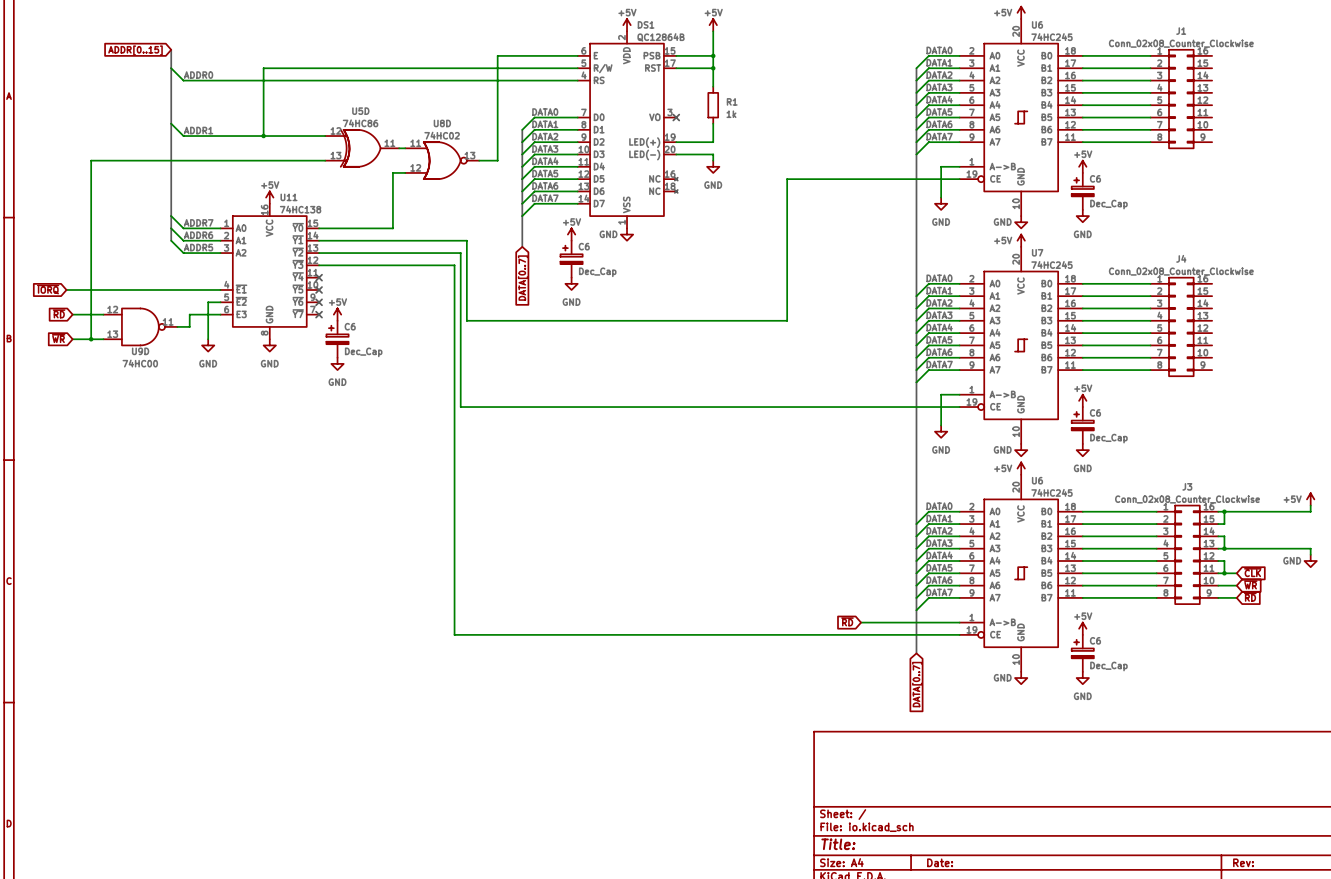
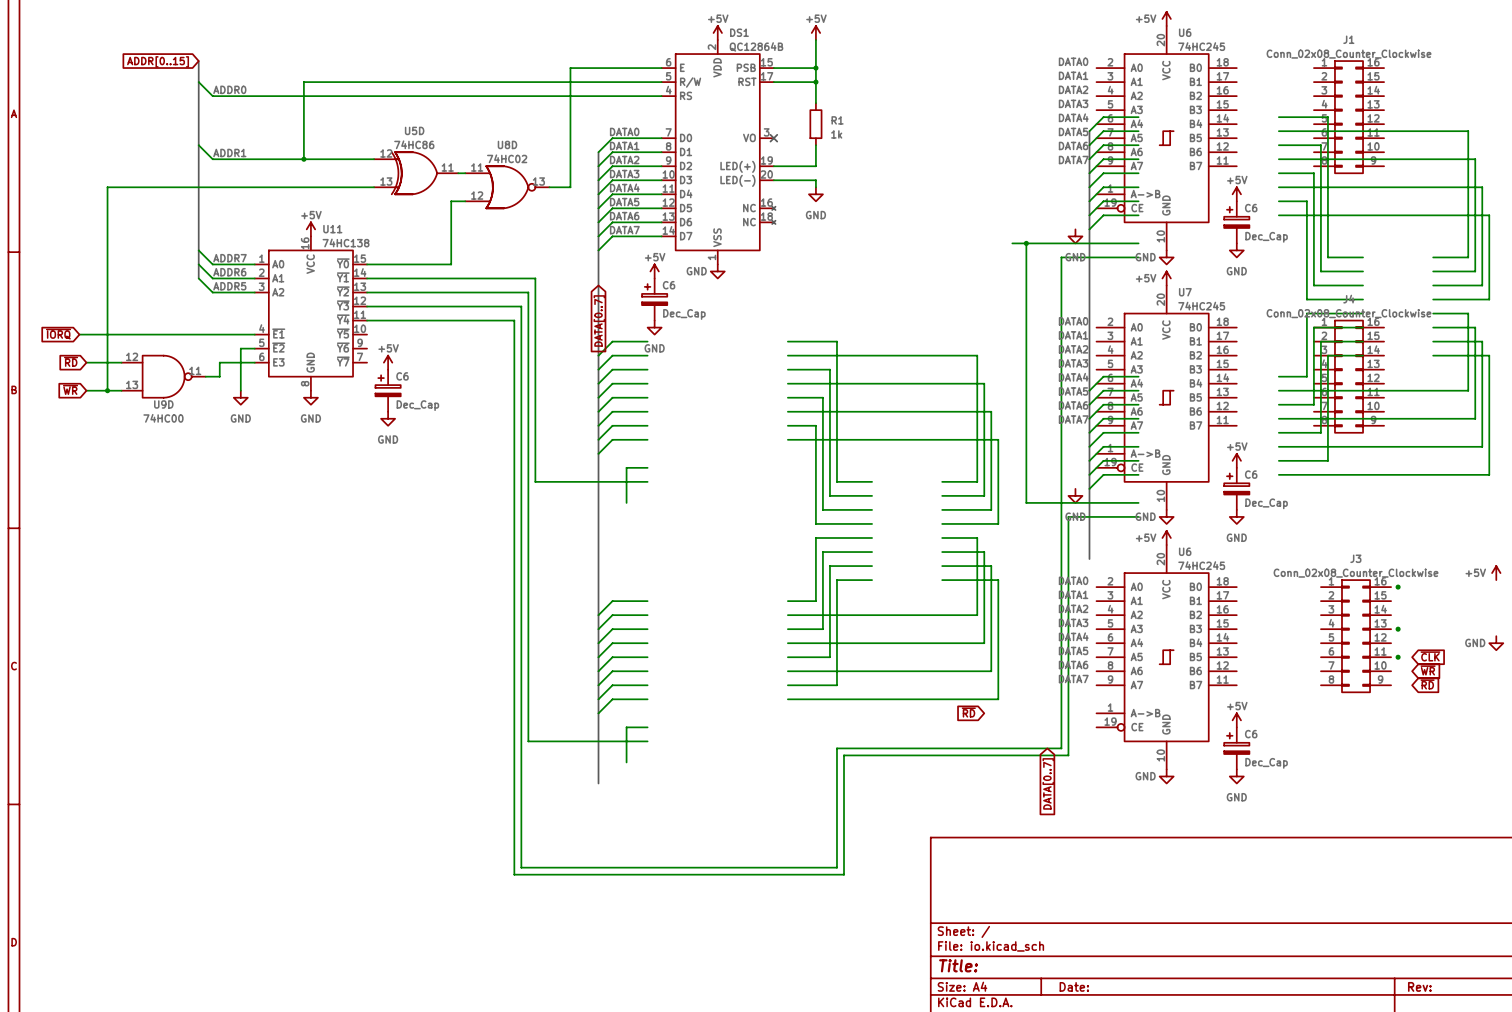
wire: (959, 55) (928, 55) (916, 68) -> (1138, 117) (1103, 117) (1089, 131)
wire: (1082, 55) (1150, 55) -> none
bus: (916, 68) (916, 653) -> none
wire: (959, 68) (928, 68) (916, 80) -> (1138, 131) (1103, 131) (1089, 145)
wire: (1082, 68) (1150, 68) -> none
wire: (959, 80) (928, 80) (916, 92) -> (1138, 145) (1103, 145) (1089, 159)
wire: (1082, 80) (1150, 80) -> none
wire: (959, 92) (928, 92) (916, 105) -> (1138, 159) (1103, 159) (1089, 173)
wire: (1082, 92) (1150, 92) -> none
wire: none -> (1278, 117) (1327, 117) (1327, 257) (1363, 257)
wire: (959, 105) (928, 105) (916, 117) -> (1138, 173) (1103, 173) (1089, 187)
wire: (1082, 105) (1150, 105) -> none
bus: none -> (1089, 131) (1089, 559)
wire: none -> (1278, 131) (1468, 131) (1468, 257) (1433, 257)
wire: (959, 117) (928, 117) (916, 129) -> (1138, 187) (1103, 187) (1089, 201)
wire: (1082, 117) (1150, 117) -> none
wire: none -> (1278, 145) (1320, 145) (1320, 271) (1363, 271)
wire: (959, 129) (928, 129) (916, 142) -> (1138, 201) (1103, 201) (1089, 215)
wire: (1082, 129) (1150, 129) -> none
wire: none -> (1278, 159) (1475, 159) (1475, 271) (1433, 271)
wire: (959, 142) (928, 142) (916, 154) -> (1138, 215) (1103, 215) (1089, 229)
wire: (1082, 142) (1150, 142) -> none
wire: none -> (1278, 173) (1313, 173) (1313, 285) (1363, 285)
wire: none -> (1278, 187) (1482, 187) (1482, 285) (1433, 285)
wire: (959, 166) (941, 166) (941, 197) -> none
wire: none -> (1278, 201) (1306, 201) (1306, 299) (1363, 299)
wire: (959, 179) (787, 179) (787, 320) (725, 320) -> (872, 495) (829, 495) (829, 369)
wire: none -> (1278, 215) (1489, 215) (1489, 299) (1433, 299)
wire: none -> (1012, 243) (1138, 243)
wire: none -> (1026, 243) (1026, 502) (1138, 502)
junction: none -> (1026, 243)
wire: none -> (1138, 257) (1061, 257) (1061, 748) (836, 748) (836, 867) (521, 867) (521, 727)
bus: none -> (598, 285) (598, 783)
wire: none -> (1363, 313) (1306, 313) (1306, 376) (1278, 376)
wire: none -> (1433, 313) (1468, 313) (1468, 390) (1278, 390)
wire: none -> (367, 320) (514, 320) (514, 874) (844, 874) (844, 755) (1068, 755) (1068, 516) (1138, 516)
no-connect mark: (319, 277) -> none
wire: (959, 283) (928, 283) (916, 296) -> (1138, 376) (1103, 376) (1089, 390)
wire: (1082, 283) (1150, 283) -> none
wire: none -> (1363, 327) (1313, 327) (1313, 404) (1278, 404)
wire: none -> (1433, 327) (1475, 327) (1475, 418) (1278, 418)
no-connect mark: (319, 289) -> none
wire: none -> (647, 341) (612, 341) (598, 355)
wire: none -> (787, 341) (836, 341) (836, 481) (872, 481)
wire: (959, 296) (928, 296) (916, 308) -> (1138, 390) (1103, 390) (1089, 404)
wire: (1082, 296) (1150, 296) -> none
wire: none -> (1363, 341) (1320, 341) (1320, 432) (1278, 432)
wire: none -> (1433, 341) (1482, 341) (1482, 446) (1278, 446)
no-connect mark: (319, 302) -> none
wire: none -> (647, 355) (612, 355) (598, 369)
wire: none -> (787, 355) (977, 355) (977, 481) (942, 481)
wire: (959, 308) (928, 308) (916, 320) -> (1138, 404) (1103, 404) (1089, 418)
wire: (1082, 308) (1150, 308) -> none
wire: none -> (1363, 355) (1327, 355) (1327, 460) (1278, 460)
wire: none -> (1433, 355) (1489, 355) (1489, 474) (1278, 474)
no-connect mark: (319, 314) -> none
wire: (466, 320) (534, 320) -> (598, 383) (612, 369)
wire: none -> (535, 369) (535, 481) (647, 481)
wire: (565, 320) (688, 320) -> none
wire: (959, 320) (928, 320) (916, 333) -> (1138, 418) (1103, 418) (1089, 432)
wire: (1082, 320) (1150, 320) -> none
wire: none -> (647, 383) (612, 383) (598, 397)
wire: none -> (787, 383) (984, 383) (984, 495) (942, 495)
wire: (959, 333) (928, 333) (916, 345) -> (1138, 432) (1103, 432) (1089, 446)
wire: (1082, 333) (1150, 333) -> none
wire: none -> (647, 397) (612, 397) (598, 411)
wire: none -> (787, 397) (822, 397) (822, 509) (872, 509)
wire: (959, 345) (928, 345) (916, 357) -> (1138, 446) (1103, 446) (1089, 460)
wire: (1082, 345) (1150, 345) -> none
wire: none -> (647, 411) (612, 411) (598, 425)
wire: none -> (787, 411) (991, 411) (991, 509) (942, 509)
wire: (959, 357) (928, 357) (916, 370) -> (1138, 460) (1103, 460) (1089, 474)
wire: (1082, 357) (1150, 357) -> none
wire: none -> (647, 425) (612, 425) (598, 439)
wire: none -> (787, 425) (815, 425) (815, 523) (872, 523)
wire: (959, 370) (928, 370) (916, 382) -> (1138, 474) (1103, 474) (1089, 488)
wire: (1082, 370) (1150, 370) -> none
wire: none -> (647, 439) (612, 439) (598, 453)
wire: none -> (787, 439) (998, 439) (998, 523) (942, 523)
wire: (959, 394) (941, 394) (941, 425) -> none
wire: (460, 407) (546, 407) -> (626, 502) (626, 467)
wire: none -> (528, 467) (528, 741) (647, 741)
wire: (565, 407) (959, 407) -> none
wire: none -> (872, 538) (815, 538) (815, 601) (787, 601)
wire: none -> (942, 538) (977, 538) (977, 615) (787, 615)
wire: none -> (872, 552) (822, 552) (822, 629) (787, 629)
wire: none -> (942, 552) (984, 552) (984, 643) (787, 643)
wire: none -> (872, 566) (829, 566) (829, 657) (787, 657)
wire: none -> (942, 566) (991, 566) (991, 671) (787, 671)
wire: none -> (872, 580) (836, 580) (836, 685) (787, 685)
wire: none -> (942, 580) (998, 580) (998, 699) (787, 699)
wire: (1310, 505) (1310, 511) (1218, 511) -> none
wire: (959, 511) (928, 511) (916, 524) -> none
wire: (1082, 511) (1156, 511) -> none
wire: (1224, 511) (1224, 524) (1218, 524) -> none
wire: none -> (647, 601) (612, 601) (598, 615)
wire: (959, 524) (928, 524) (916, 536) -> none
wire: (1082, 524) (1156, 524) -> none
wire: none -> (647, 615) (612, 615) (598, 629)
wire: (959, 536) (928, 536) (916, 548) -> none
wire: (1082, 536) (1156, 536) -> none
wire: (1218, 536) (1224, 536) (1224, 548) -> none
wire: none -> (647, 629) (612, 629) (598, 643)
wire: (959, 548) (928, 548) (916, 560) -> none
wire: (1082, 548) (1156, 548) -> none
wire: (1218, 548) (1310, 548) (1310, 554) -> none
wire: none -> (647, 643) (612, 643) (598, 657)
wire: (959, 560) (928, 560) (916, 573) -> none
wire: (1082, 560) (1156, 560) -> none
wire: (1218, 560) (1224, 560) (1224, 573) -> none
wire: none -> (647, 657) (612, 657) (598, 671)
wire: (959, 573) (928, 573) (916, 585) -> none
wire: (1082, 573) (1156, 573) -> none
wire: (1218, 573) (1236, 573) -> none
wire: none -> (647, 671) (612, 671) (598, 685)
wire: (959, 585) (928, 585) (916, 597) -> none
wire: (1082, 585) (1156, 585) -> none
wire: (1218, 585) (1236, 585) -> none
wire: none -> (647, 685) (612, 685) (598, 699)
wire: (959, 597) (928, 597) (916, 610) -> none
wire: (1082, 597) (1156, 597) -> none
wire: (1218, 597) (1236, 597) -> none
wire: none -> (647, 699) (612, 699) (598, 713)
wire: (861, 622) (959, 622) -> none
wire: (454, 634) (546, 634) -> (626, 762) (626, 727)
wire: (565, 634) (959, 634) -> none

